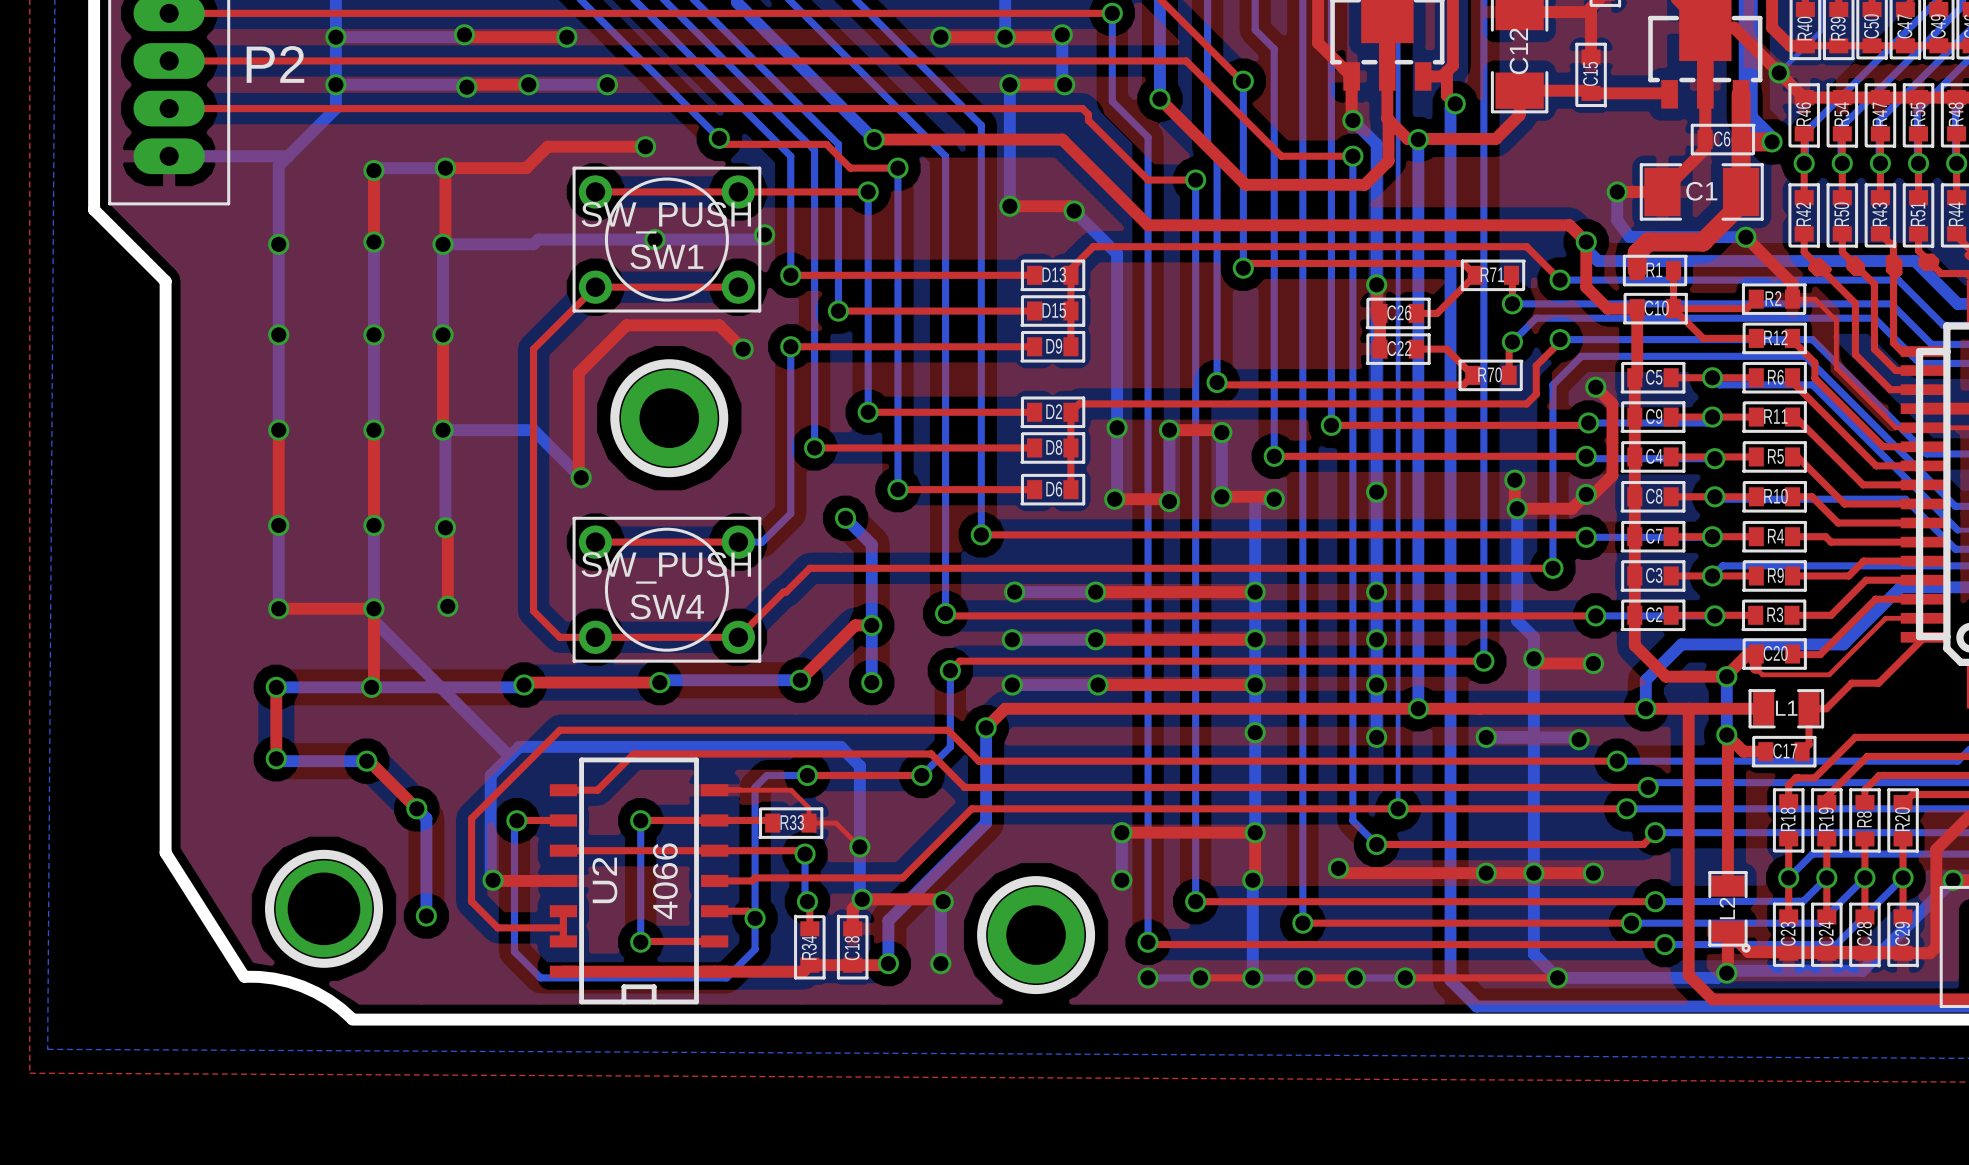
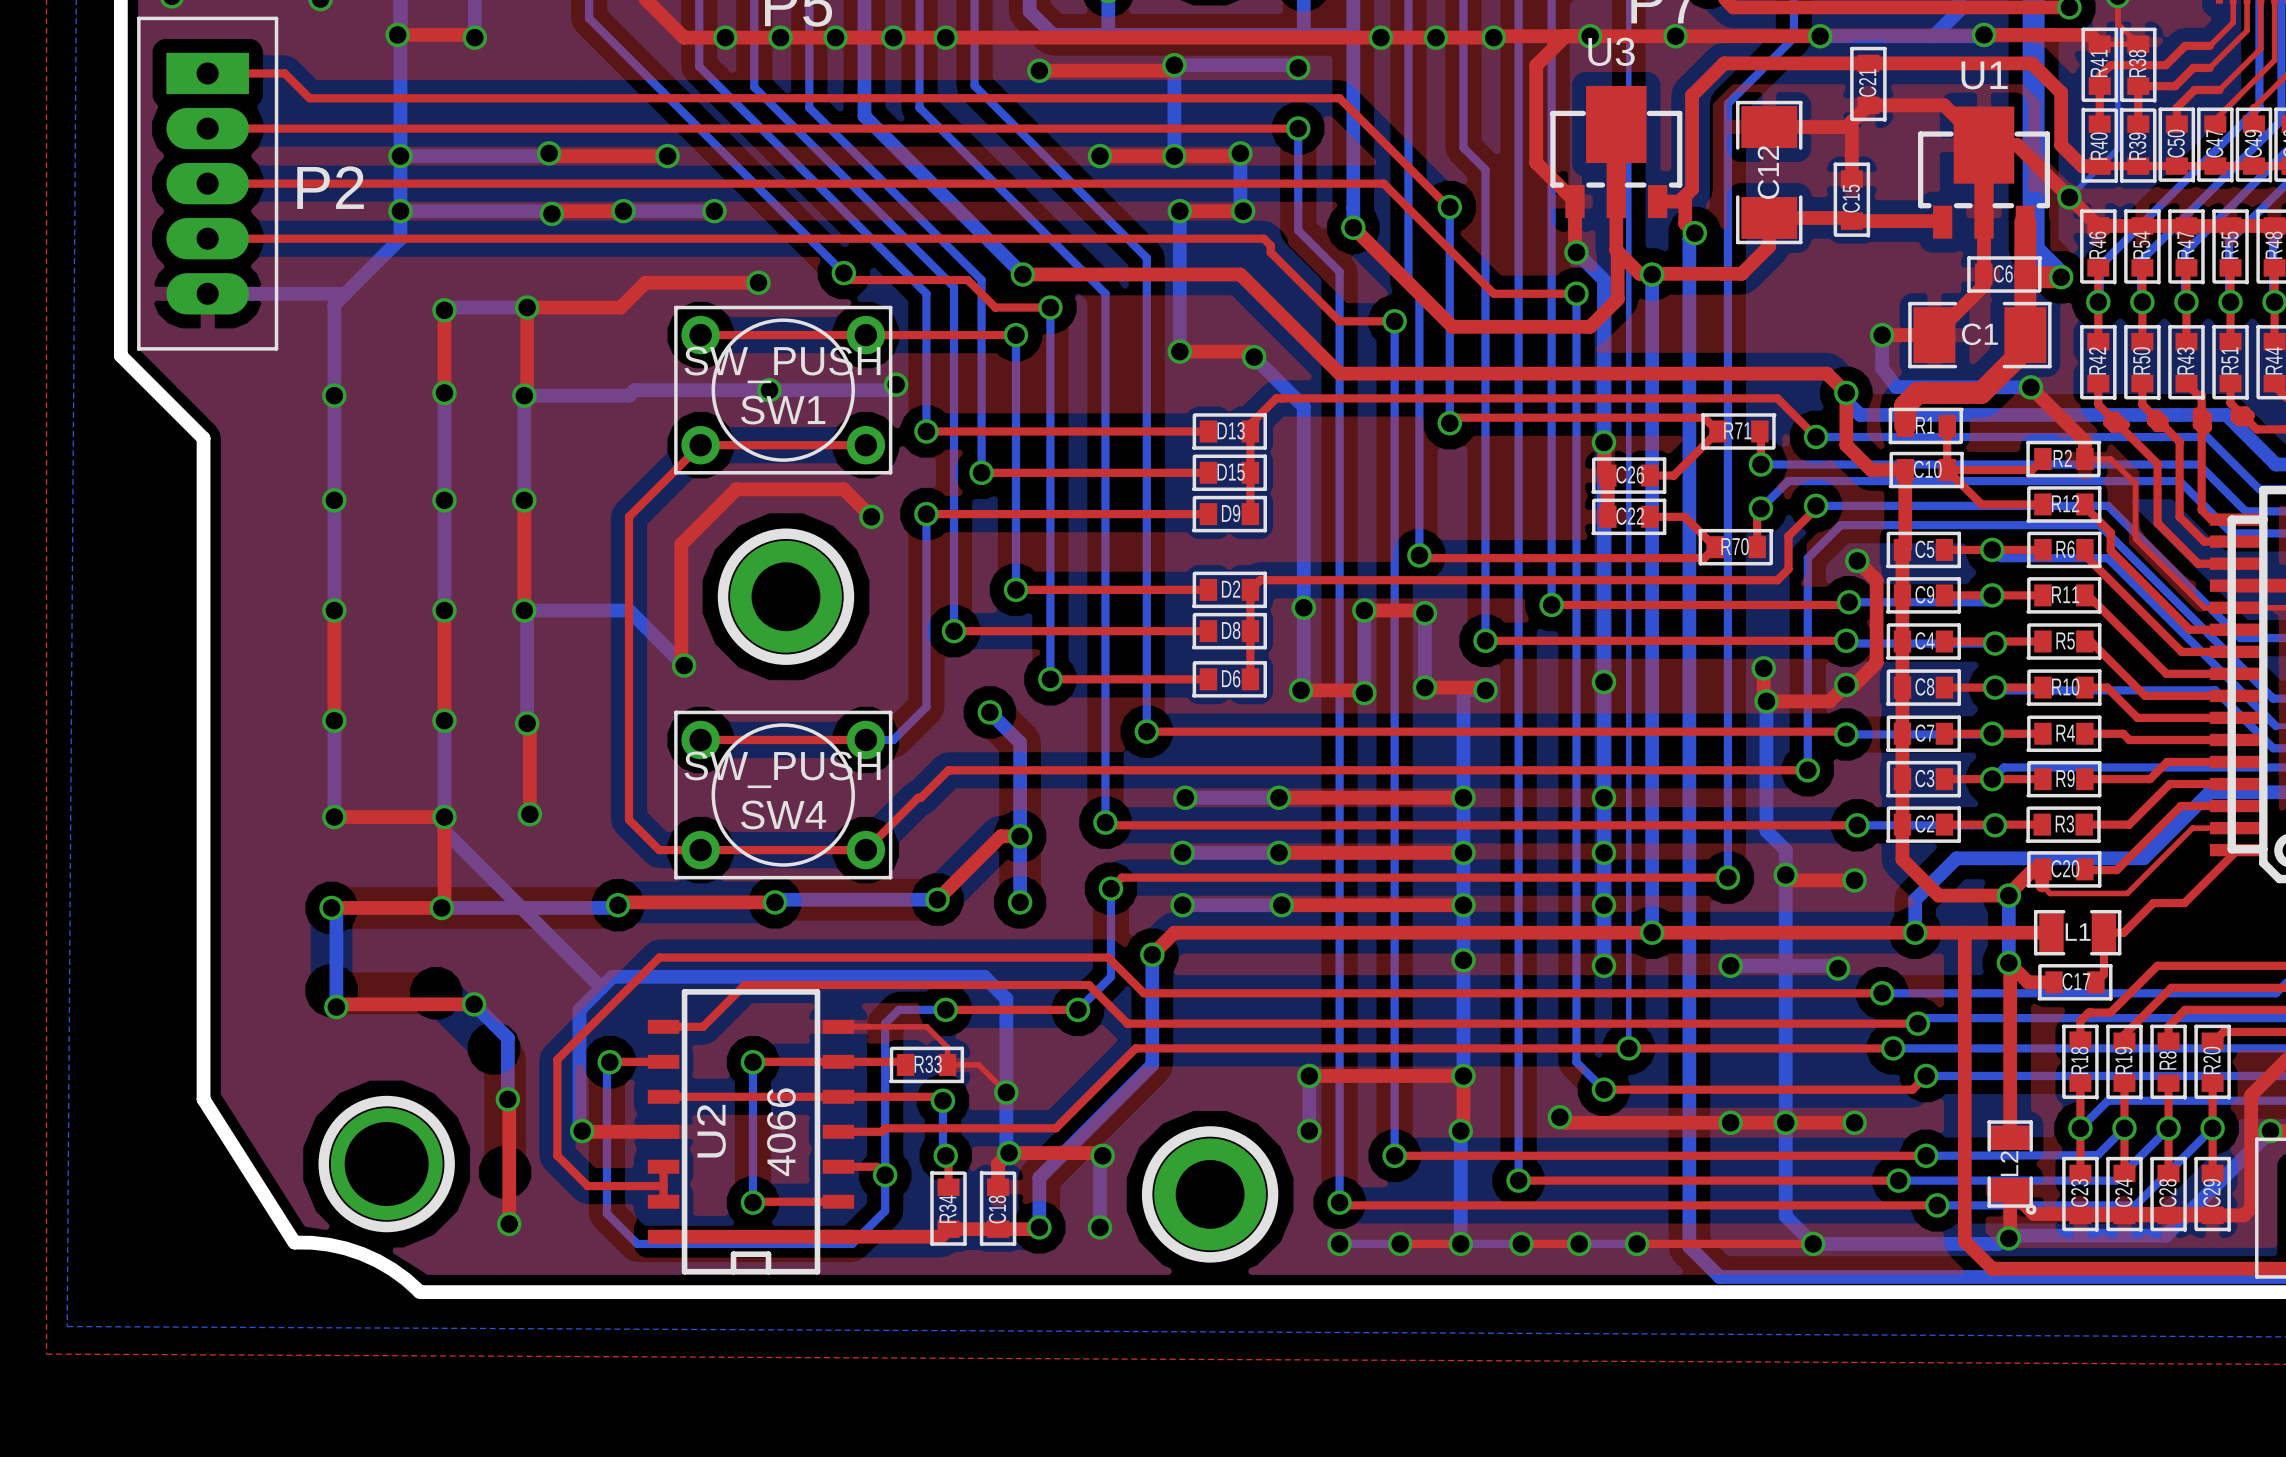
top track: (276, 687) (276, 758) -> none
bottom track: (276, 687) (371, 687) -> none
top track: none -> (337, 907) (441, 907)
bottom track: none -> (337, 907) (336, 1007)
bottom track: (276, 758) (278, 761) (366, 761) -> none
via position: (276, 758) -> (336, 1007)
top track: (366, 761) (369, 761) (416, 808) -> none
via: (366, 761) -> none
top track: none -> (474, 1004) (339, 1004) (336, 1007)
bottom track: none -> (474, 1004) (507, 1038) (507, 1099)
via: none -> (474, 1004)
bottom track: (416, 808) (426, 818) (426, 916) -> none
via: (416, 808) -> none
top track: none -> (507, 1099) (509, 1223)
via: none -> (507, 1099)
via: (426, 916) -> none
via: none -> (509, 1223)

